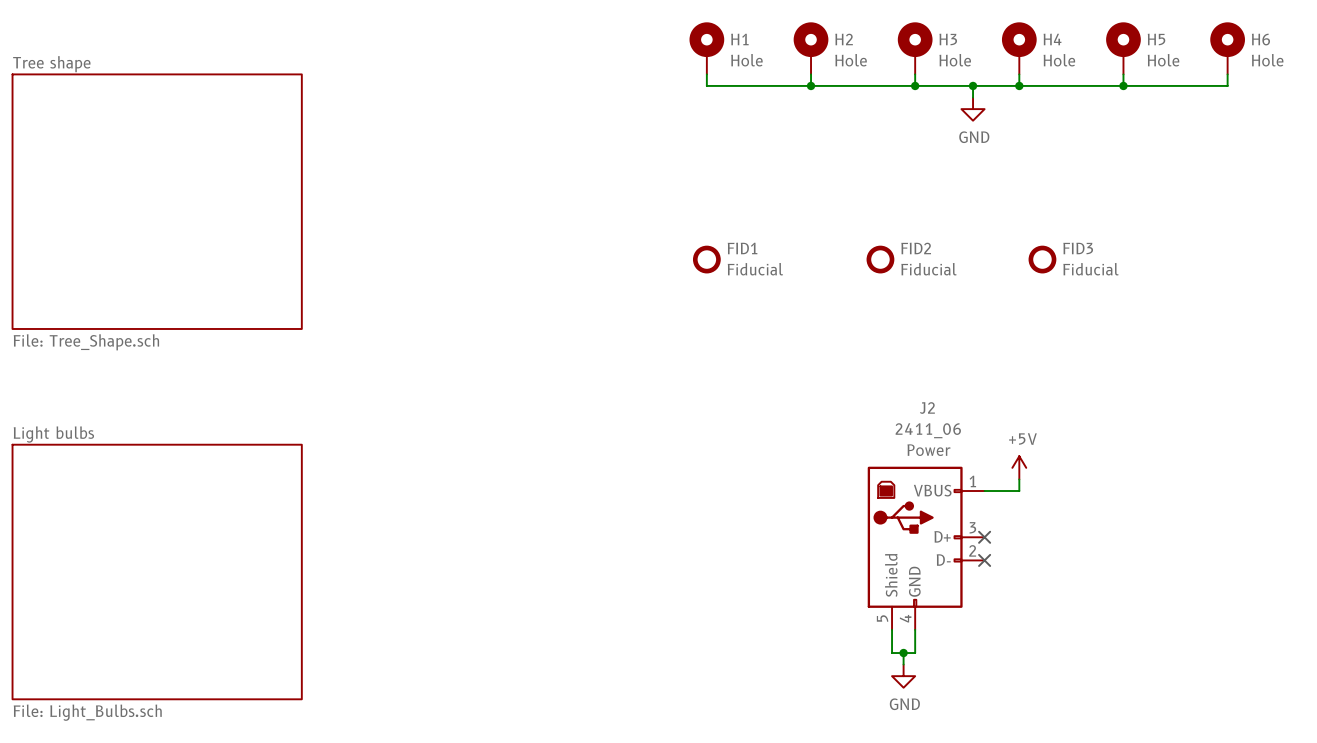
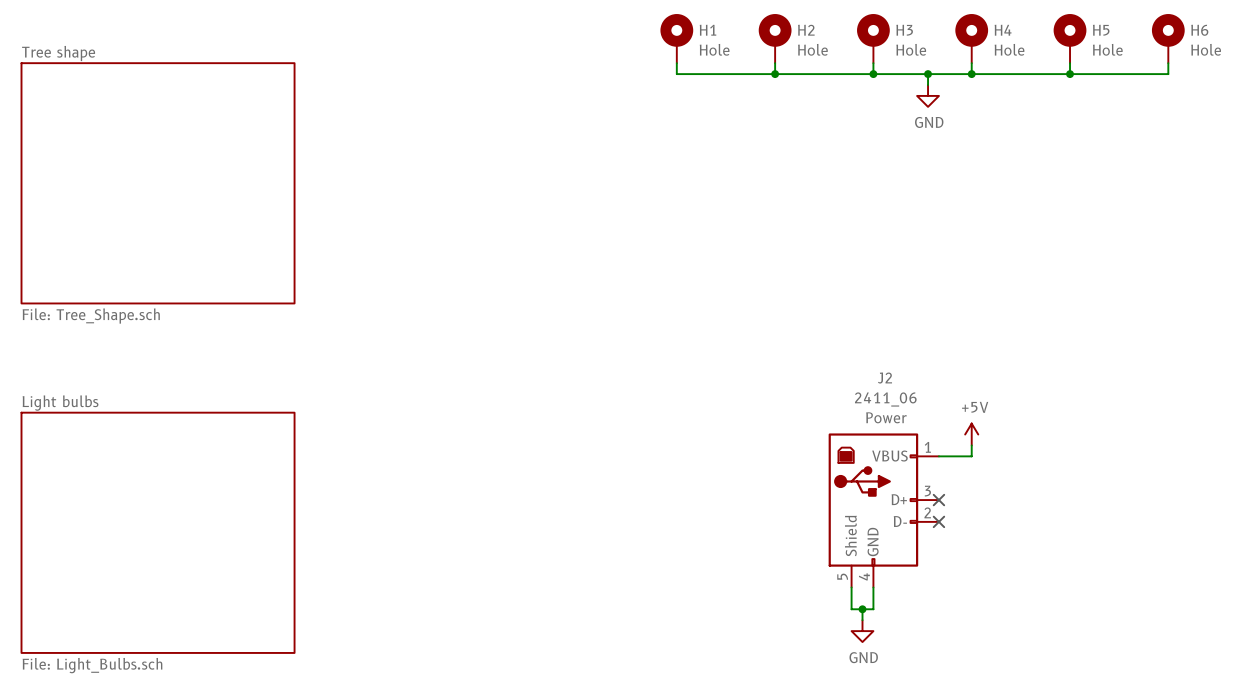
FID1: Fiducial (706, 259) -> none
FID2: Fiducial (880, 259) -> none
FID3: Fiducial (1042, 259) -> none

